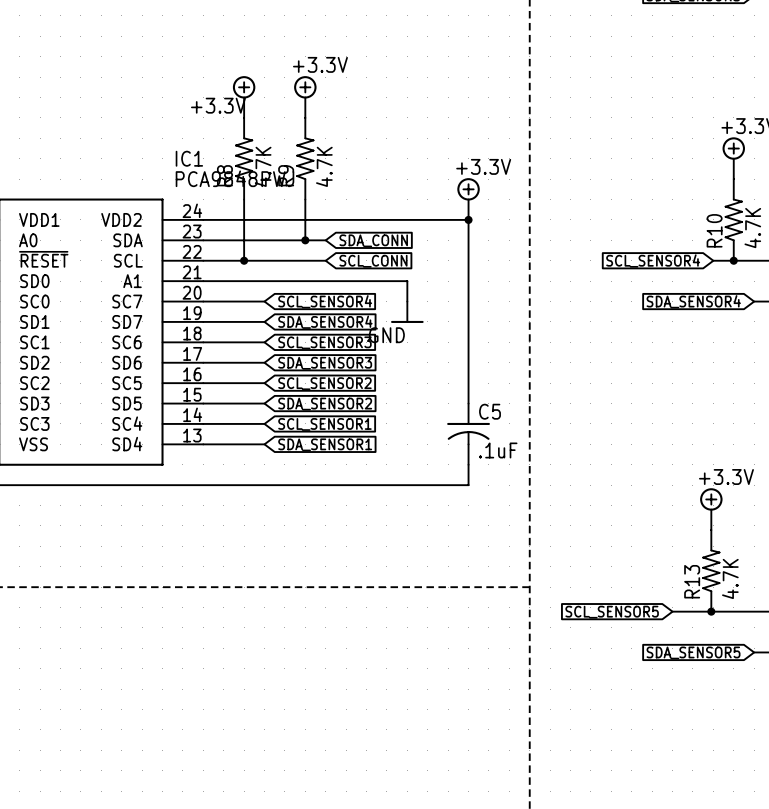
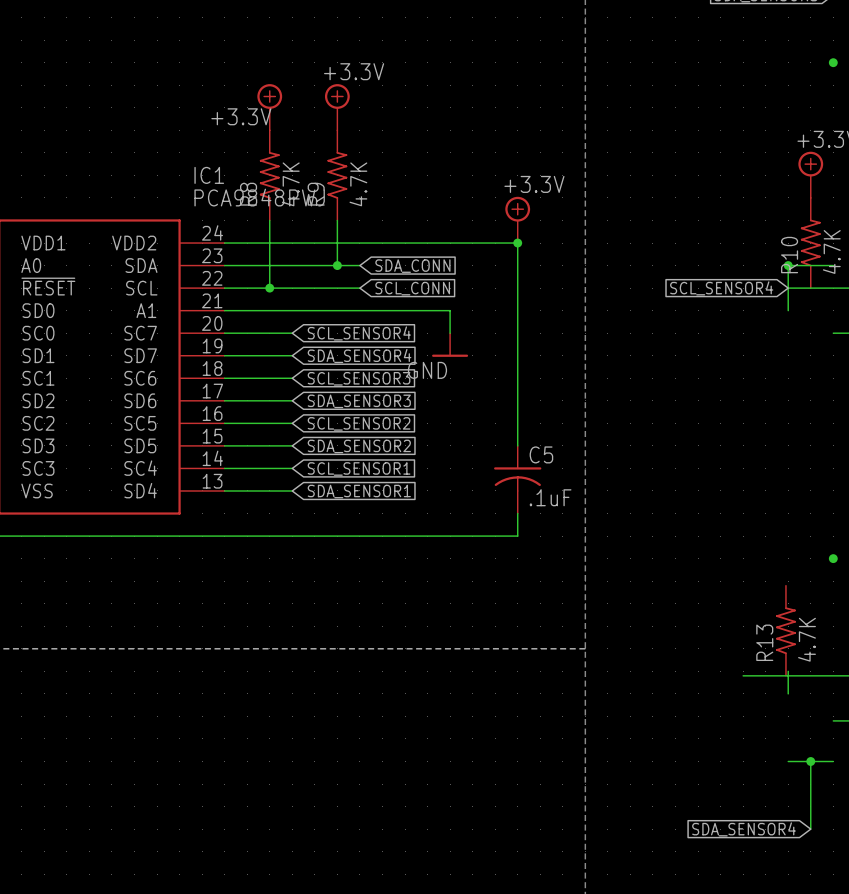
junction: none -> (833, 62)
wire: none -> (833, 265) (788, 265) (788, 310)
junction position: (733, 260) -> (788, 265)
global label: SDA_SENSOR4 (693, 301) -> none
junction: none -> (833, 558)
power symbol: +3.3V (711, 509) -> none
wire: none -> (788, 671) (788, 693)
junction: (711, 611) -> none
global label: SCL_SENSOR5 (612, 612) -> none
global label: SDA_SENSOR5 (693, 652) -> none
wire: none -> (788, 761) (833, 761)
wire: none -> (810, 761) (810, 829)
junction: none -> (810, 761)
global label: none -> SDA_SENSOR4 (743, 829)

